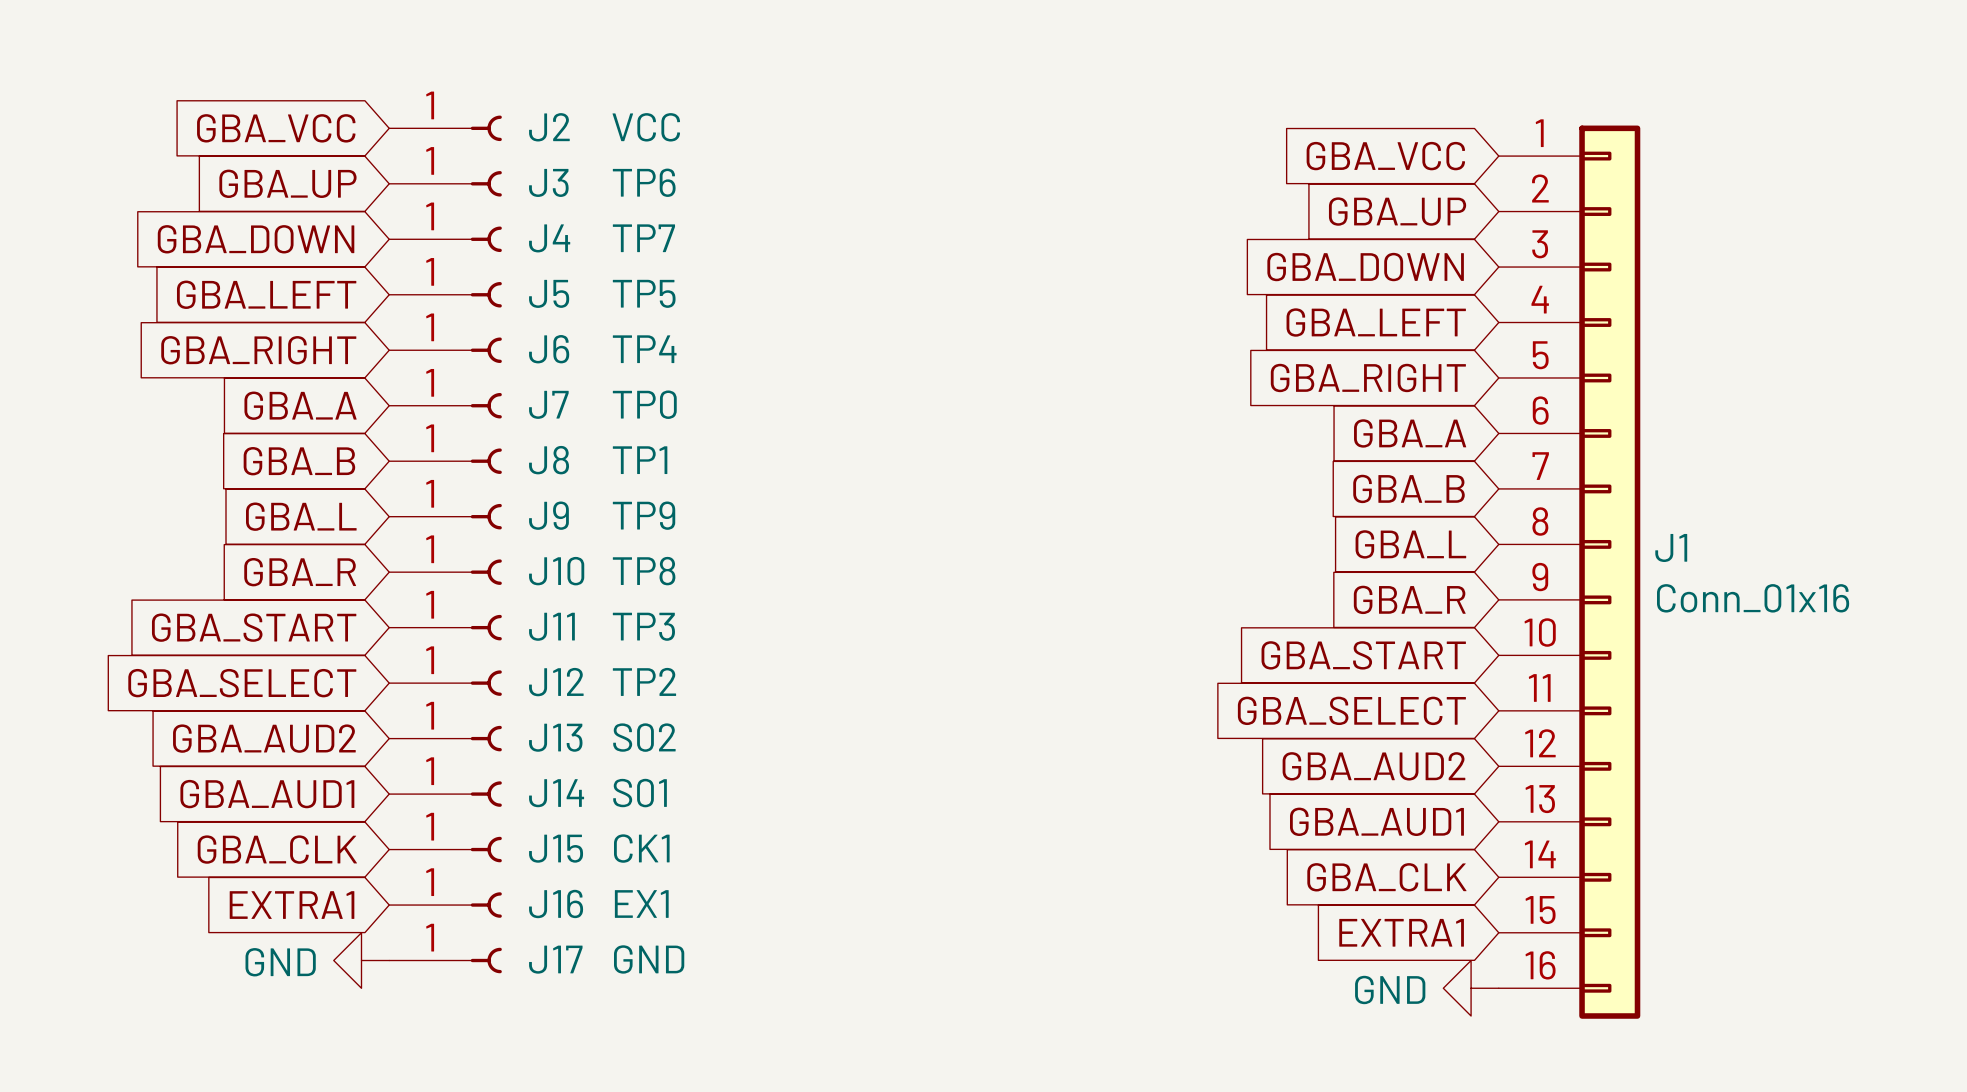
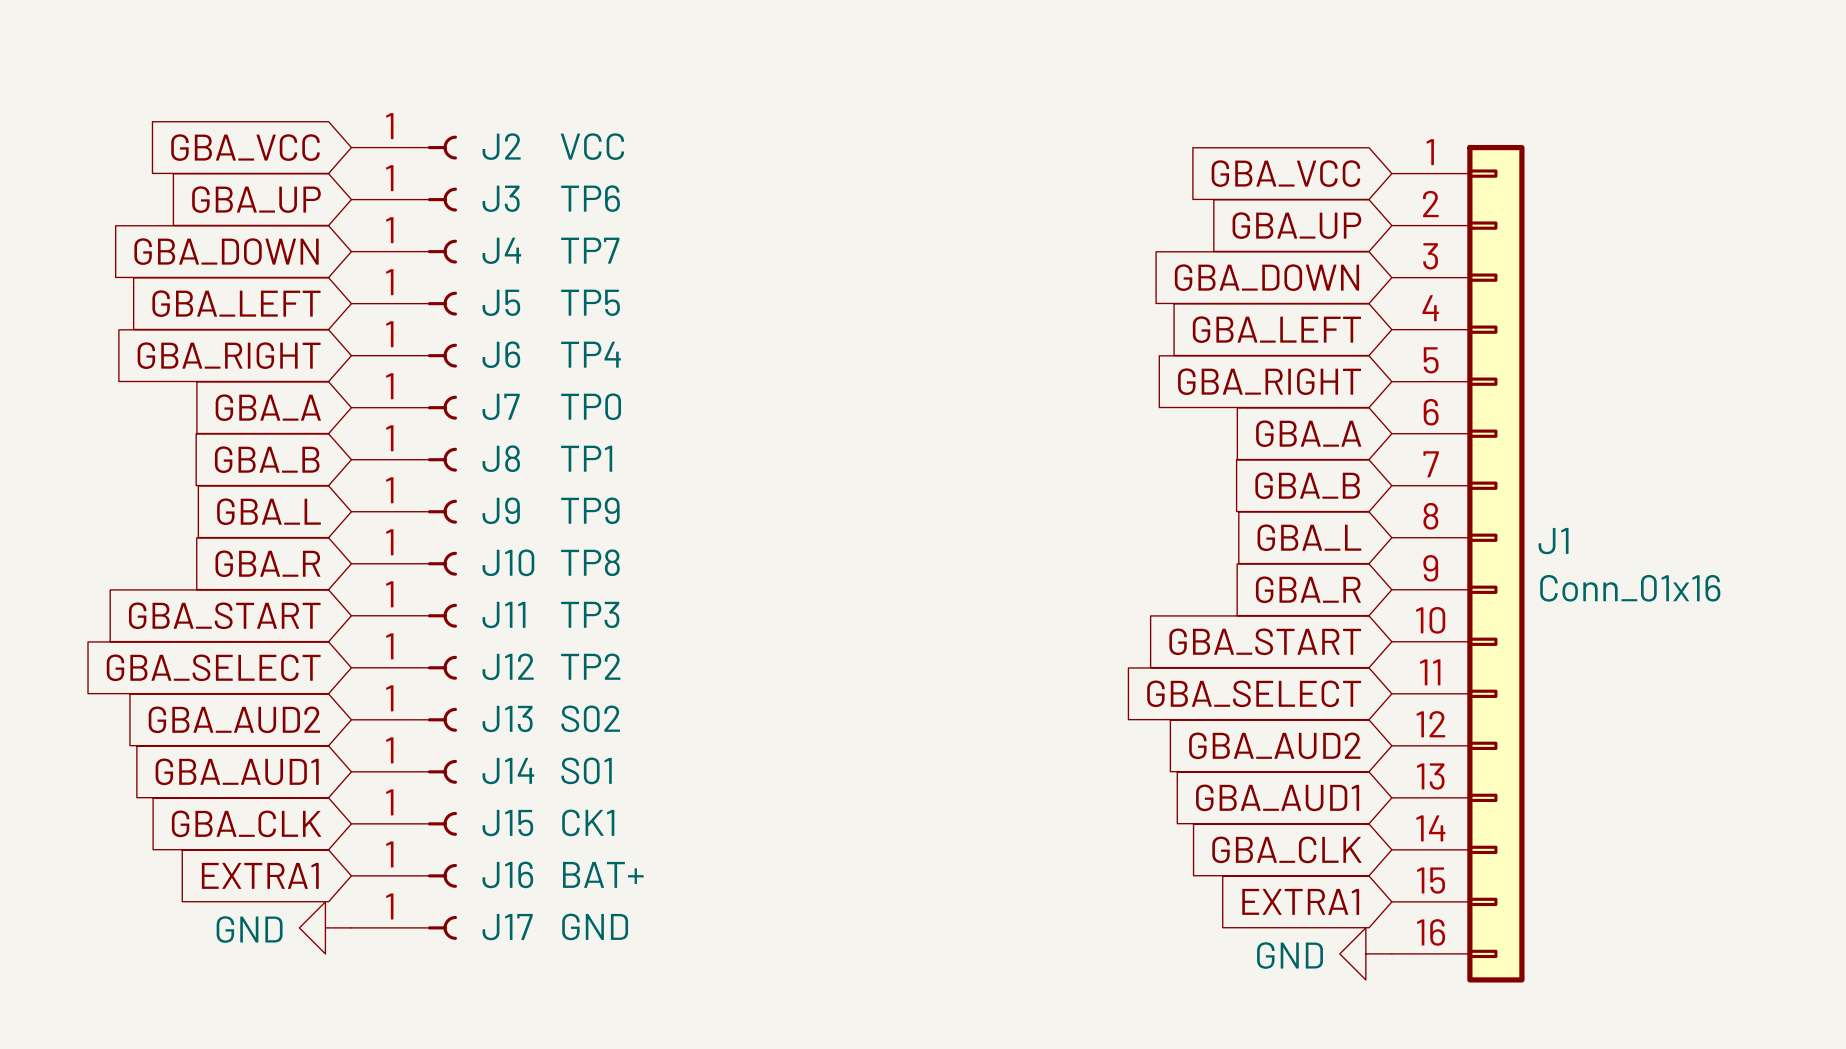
J16 value: EX1 (641, 904) -> BAT+ (603, 874)

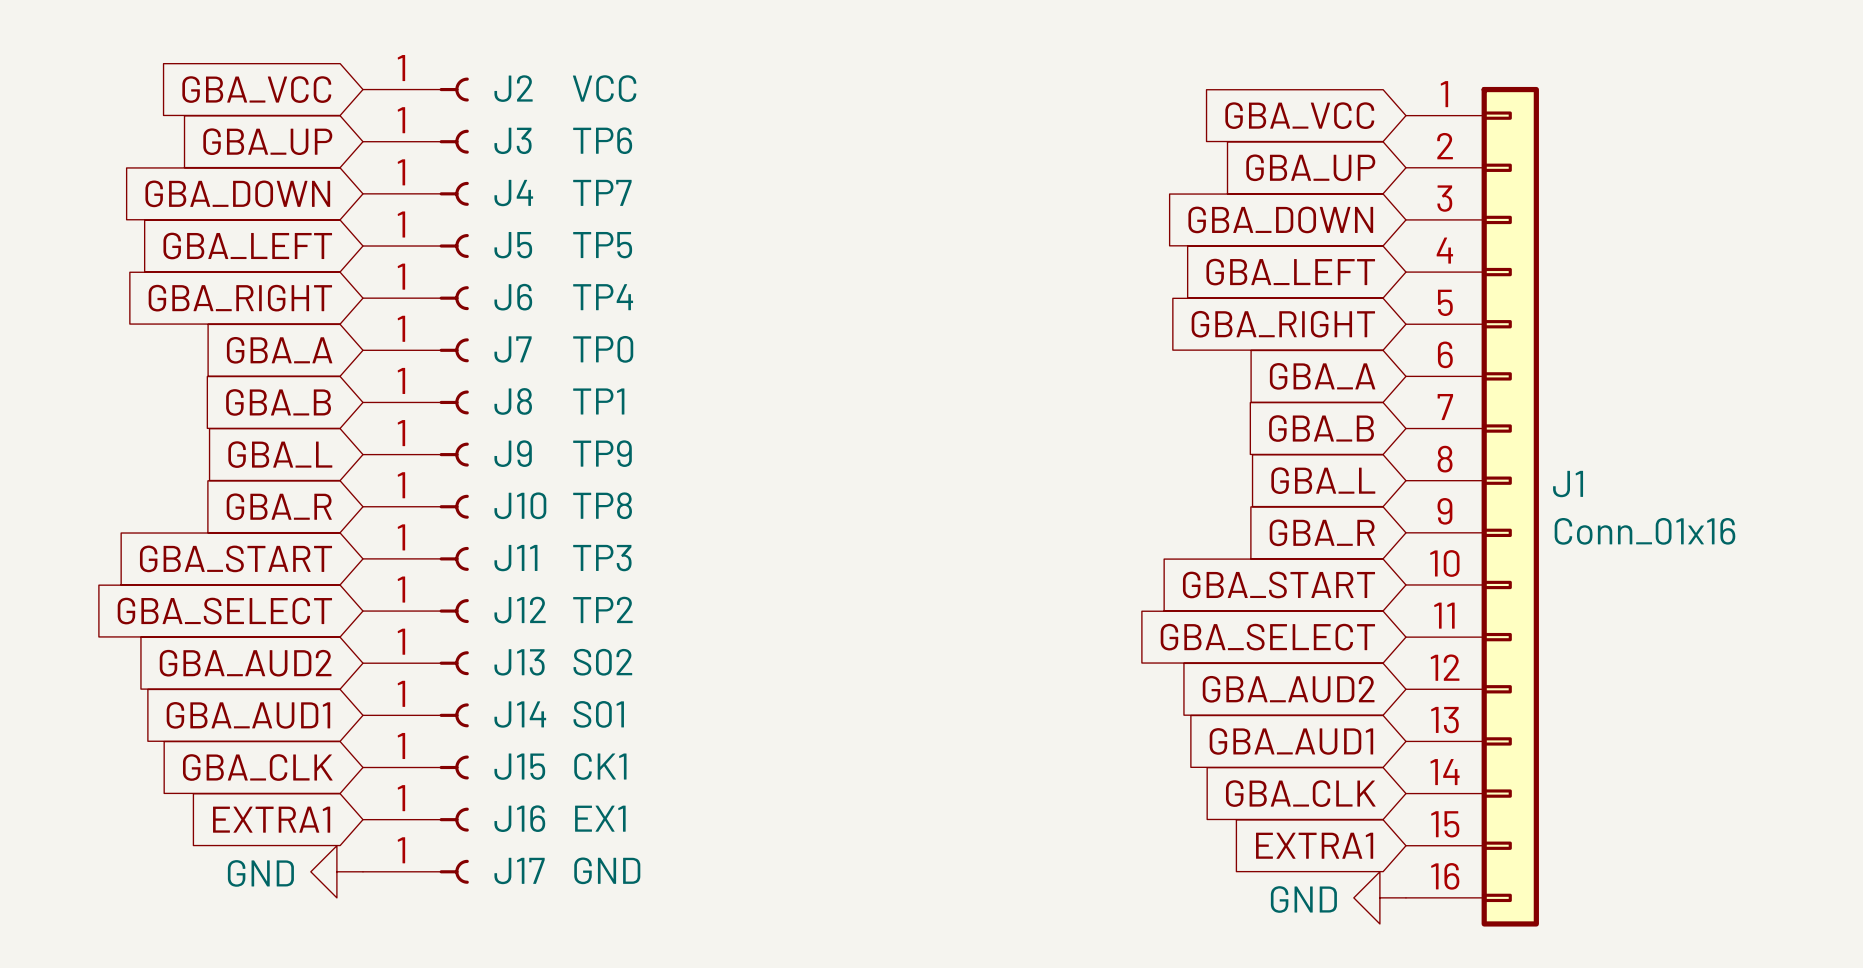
J16 value: BAT+ (603, 874) -> EX1 (600, 818)

